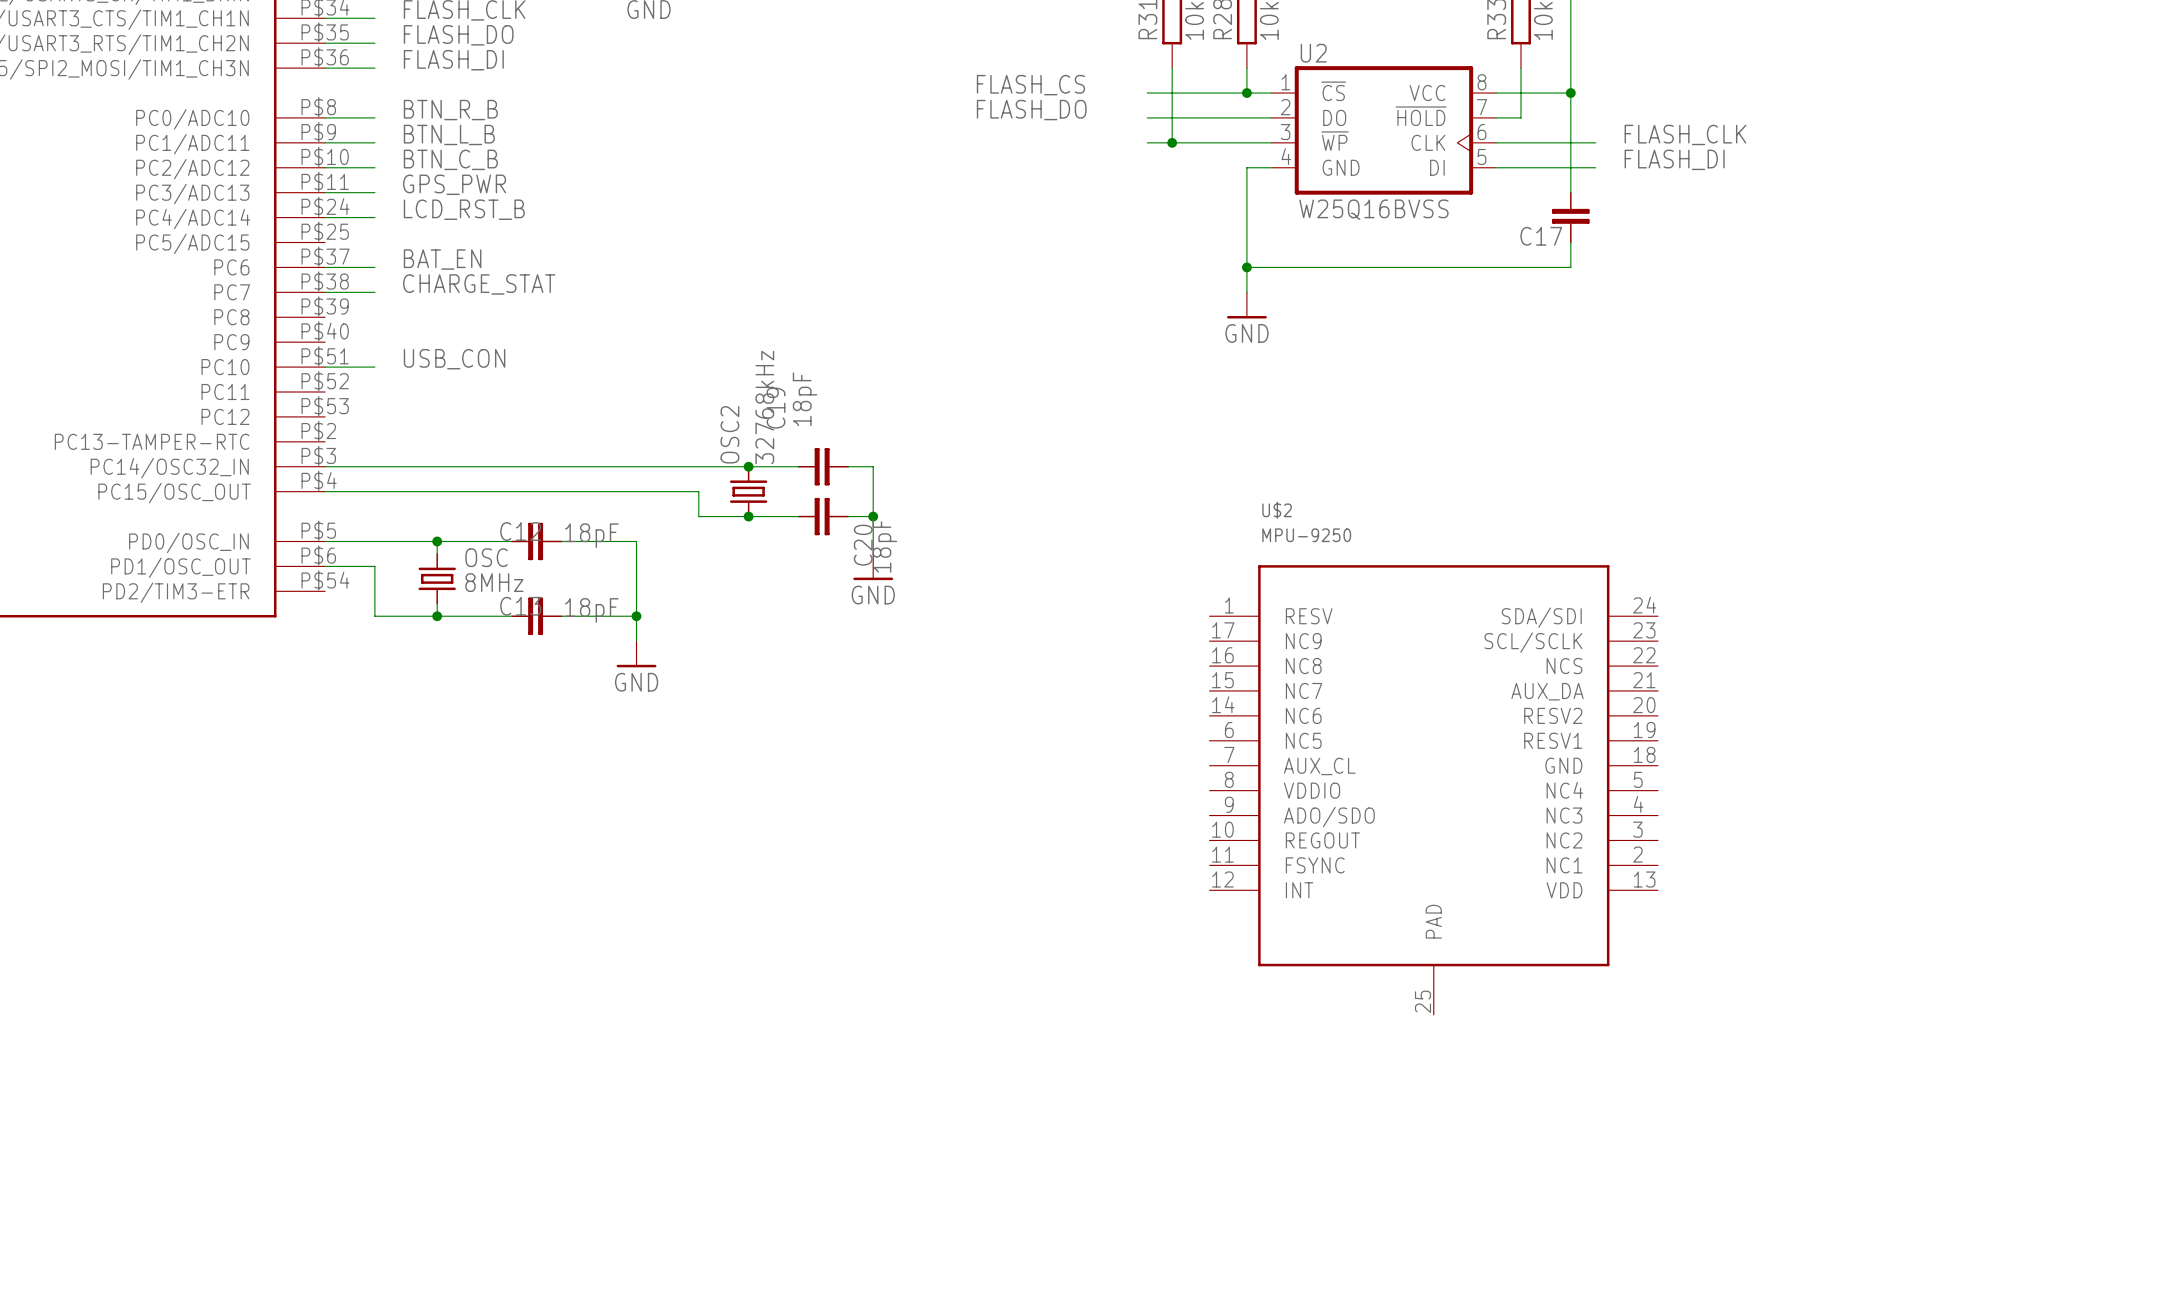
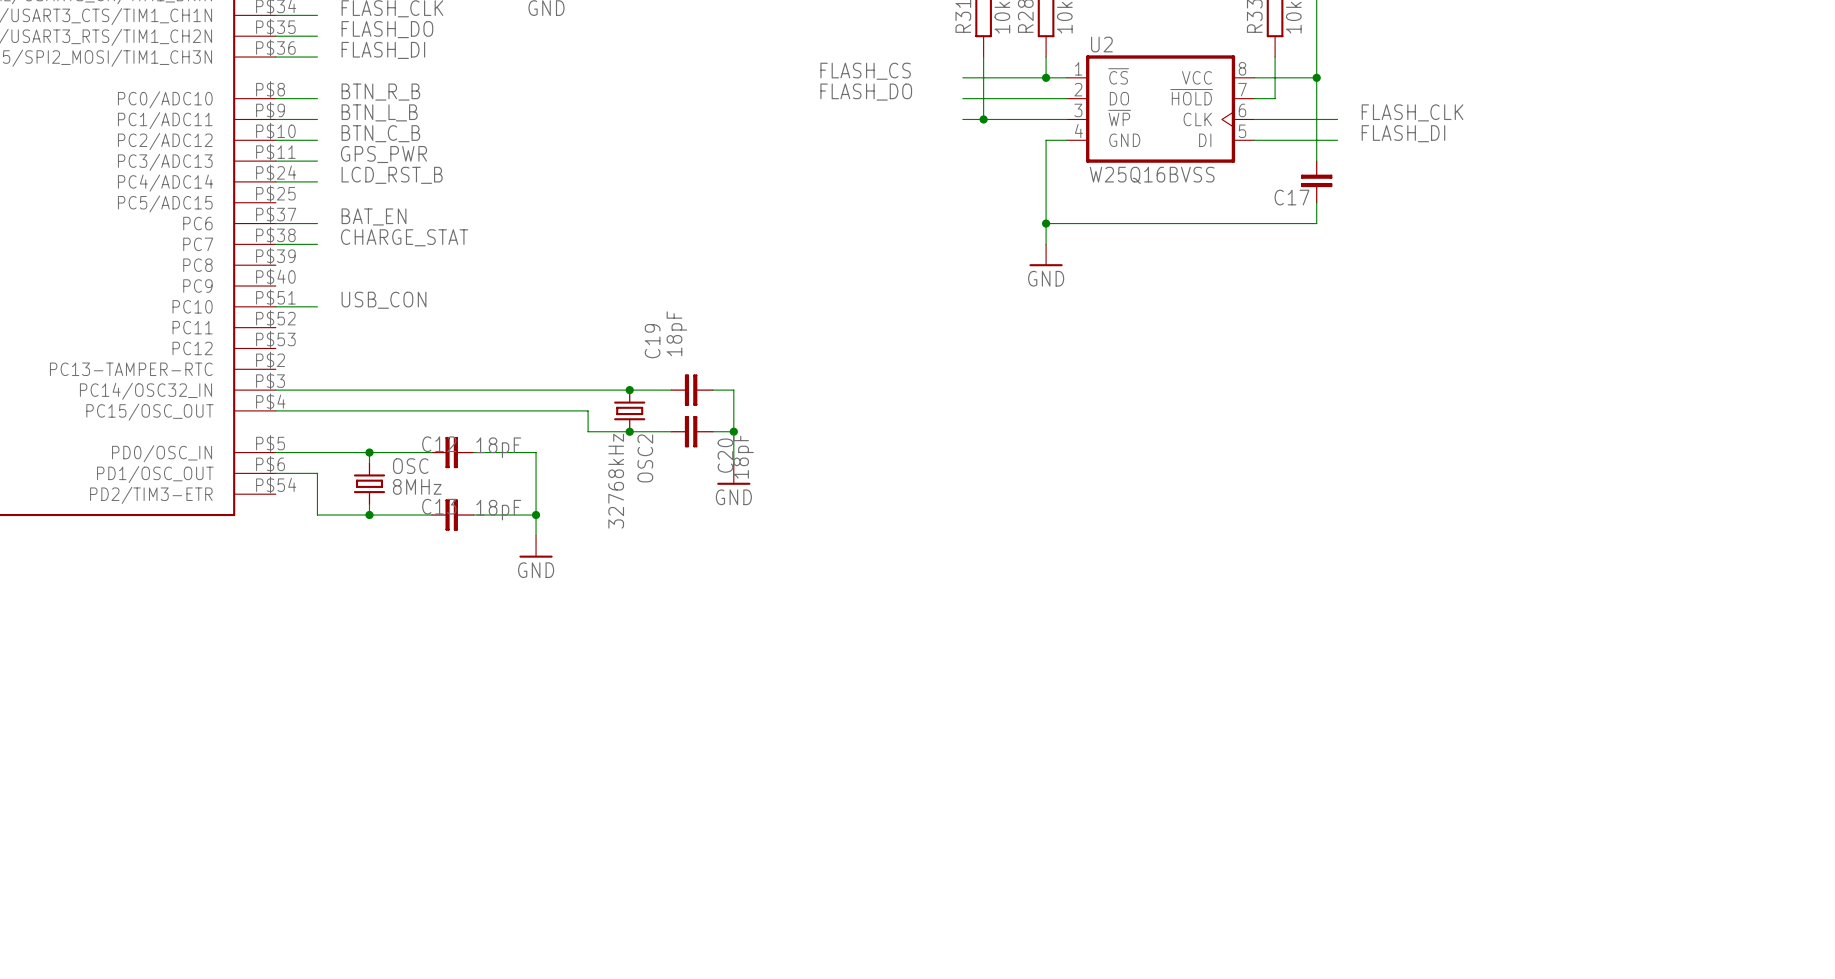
OSC2 value position: 32768kHz (764, 407) -> 32768kHz (616, 481)
OSC2 name position: OSC2 (729, 434) -> OSC2 (645, 458)
U$2: MPU-9250 (1433, 790) -> none

